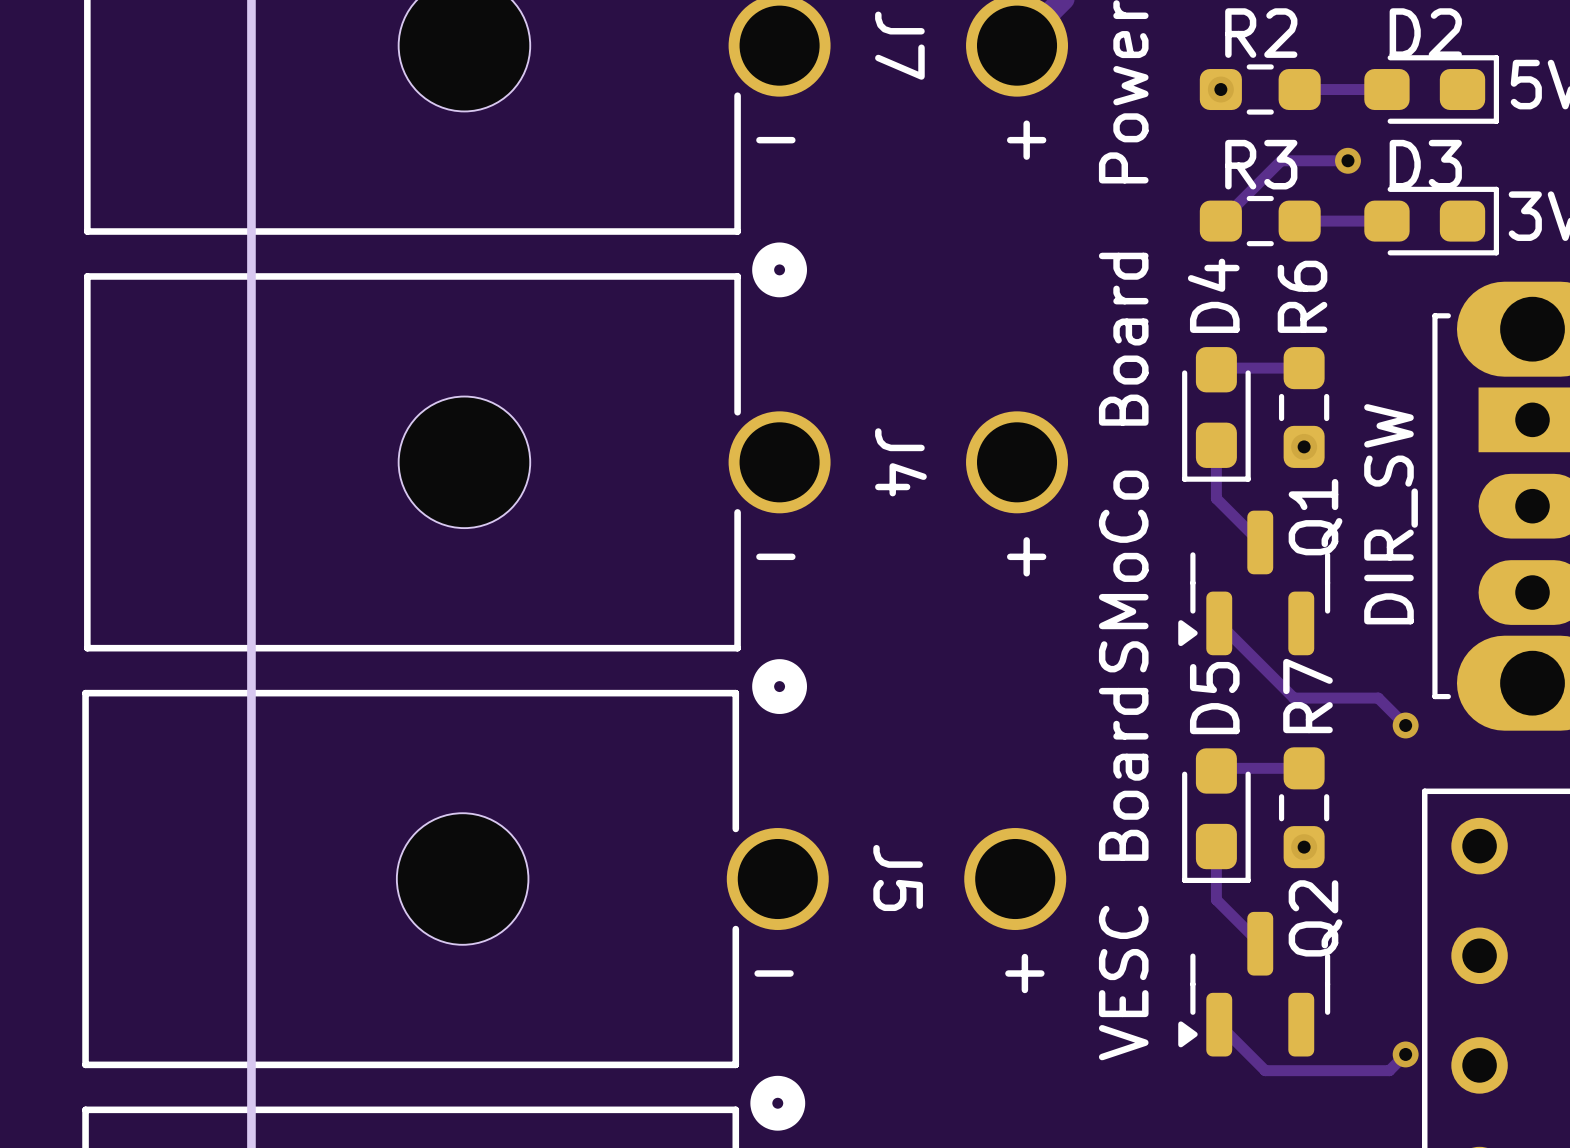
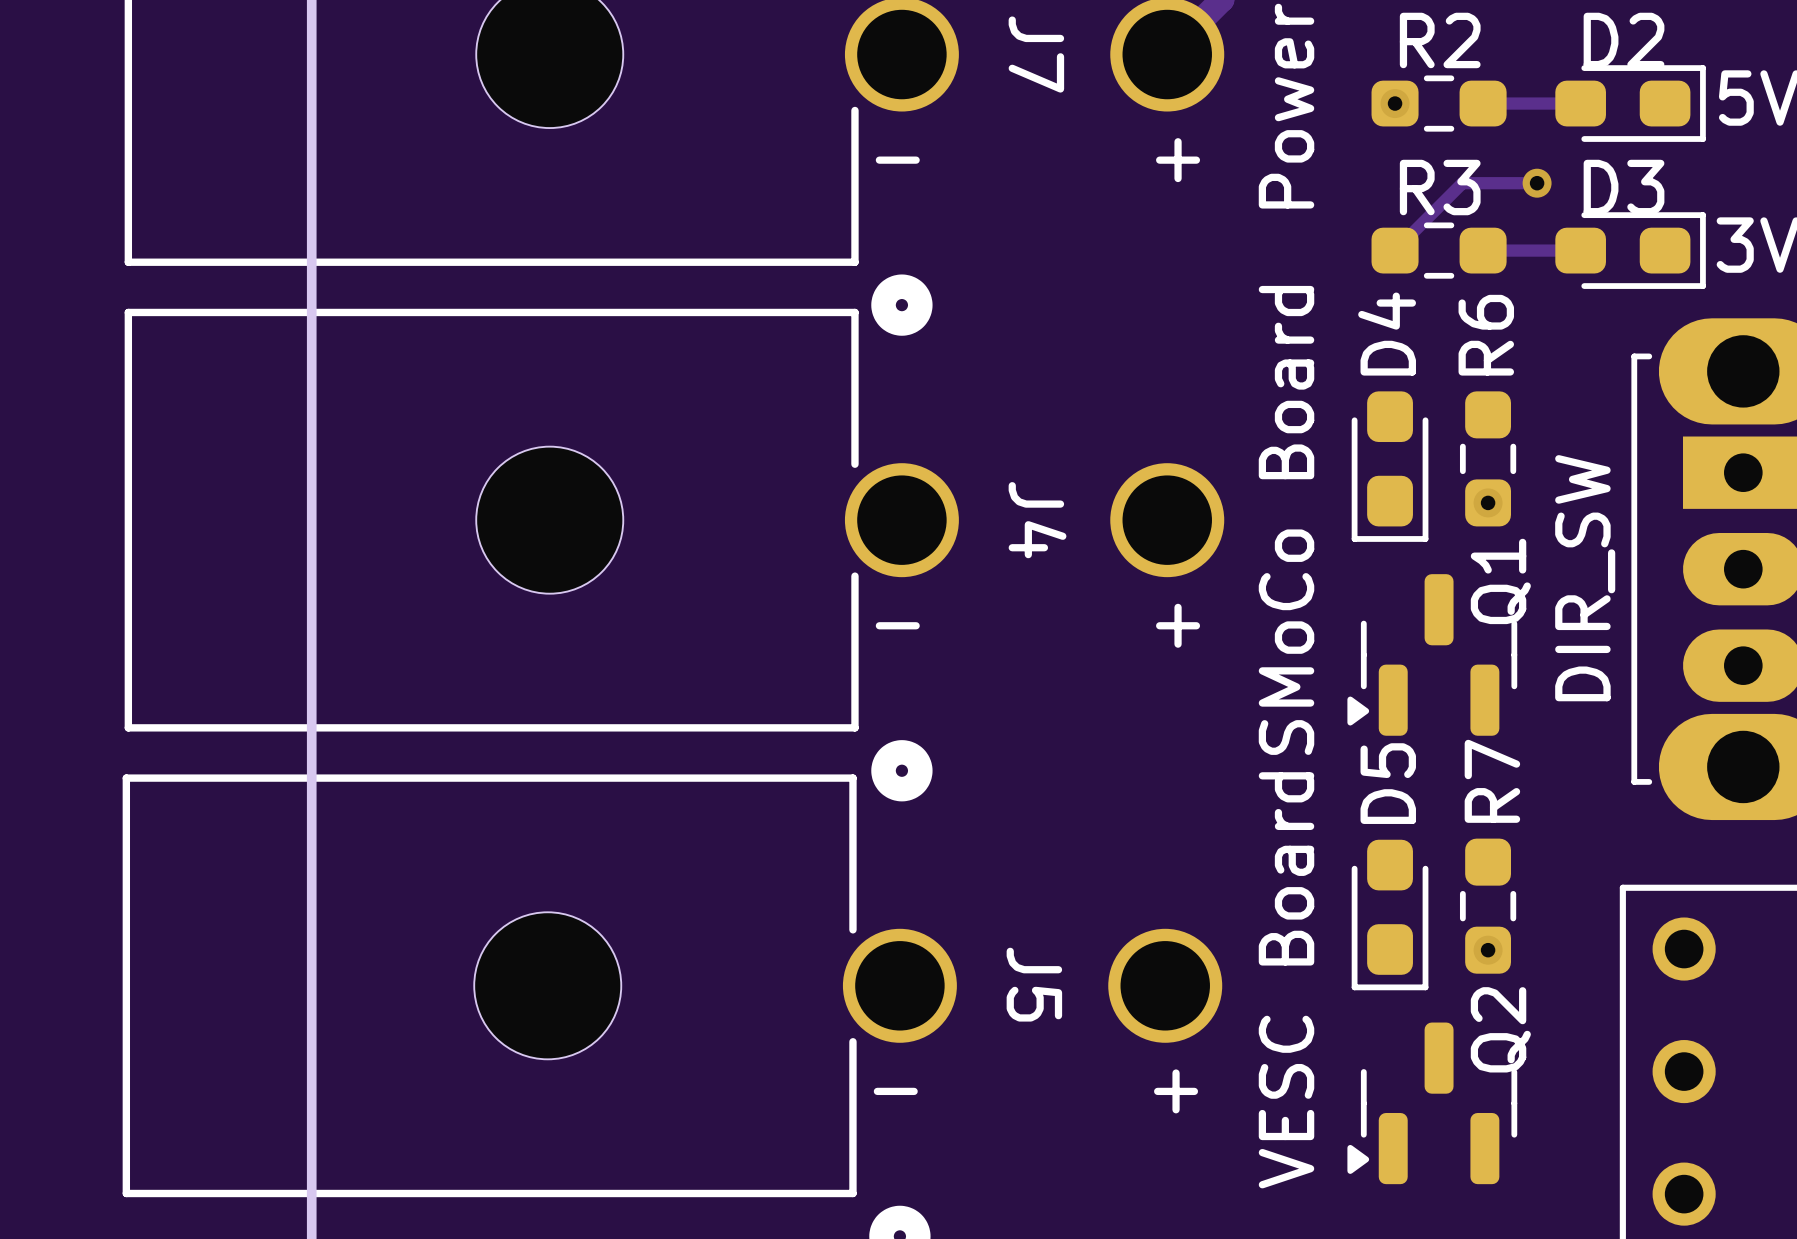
track: (1304, 368) (1218, 368) (1216, 369) -> none
track: (1216, 445) (1216, 498) (1260, 542) -> none
track: (1219, 623) (1293, 698) (1378, 698) (1405, 725) -> none
via: (1405, 725) -> none
track: (1304, 768) (1219, 768) (1216, 770) -> none
track: (1216, 846) (1216, 899) (1260, 943) -> none
track: (1219, 1024) (1265, 1070) (1389, 1070) (1405, 1054) -> none
via: (1405, 1054) -> none

